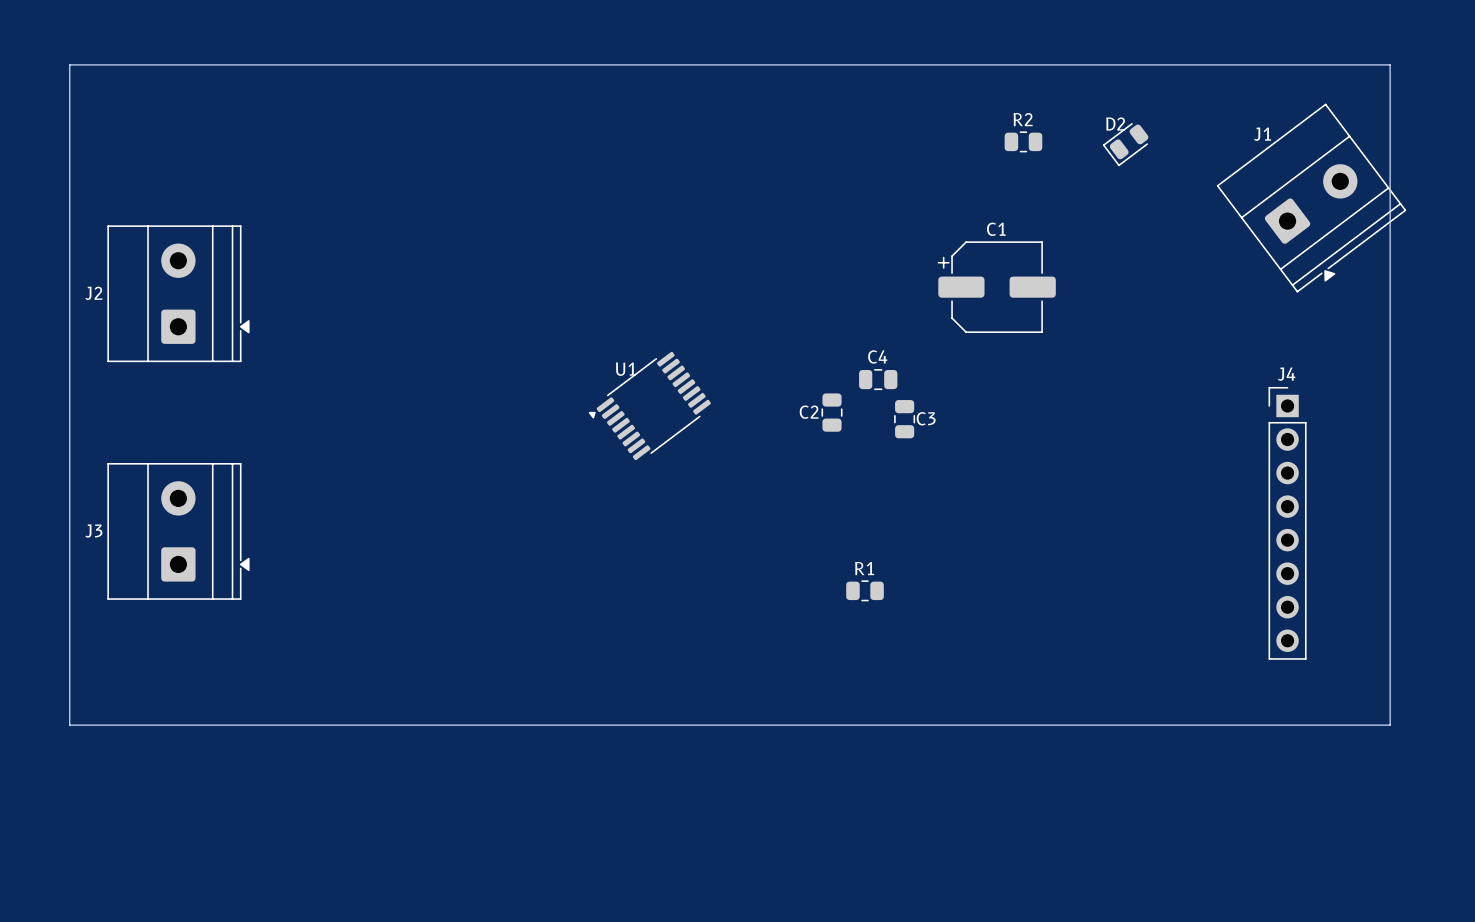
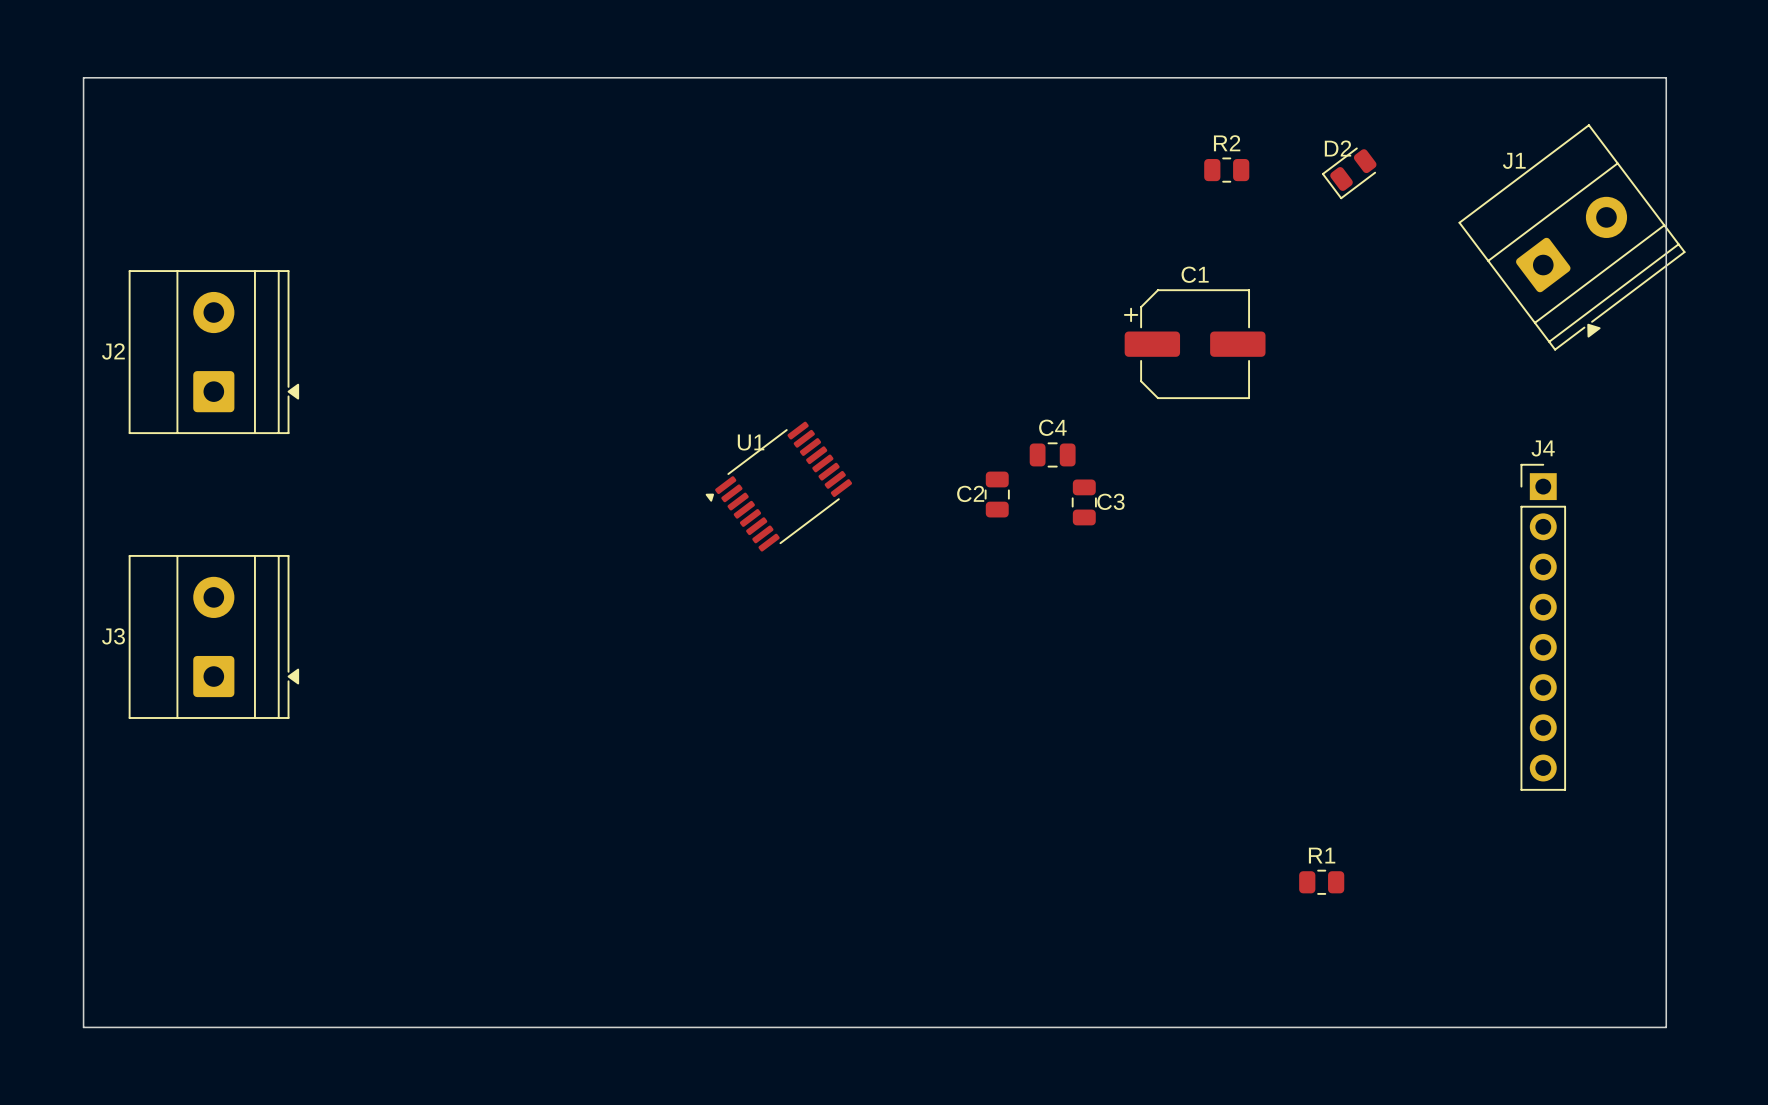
R1 position: (865, 590) -> (1321, 882)
board edge: (69, 725) (1390, 725) -> (83, 869) (83, 1027) (1666, 1027) (1666, 869)

